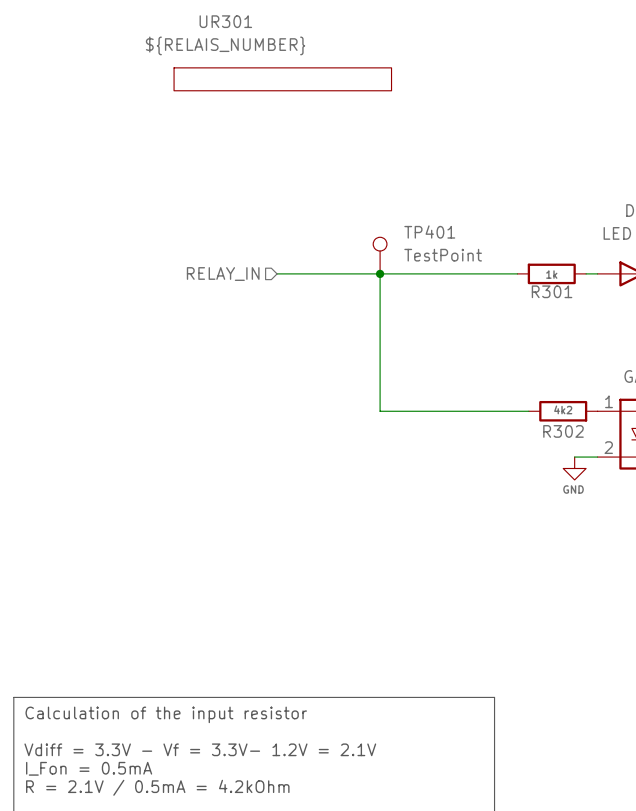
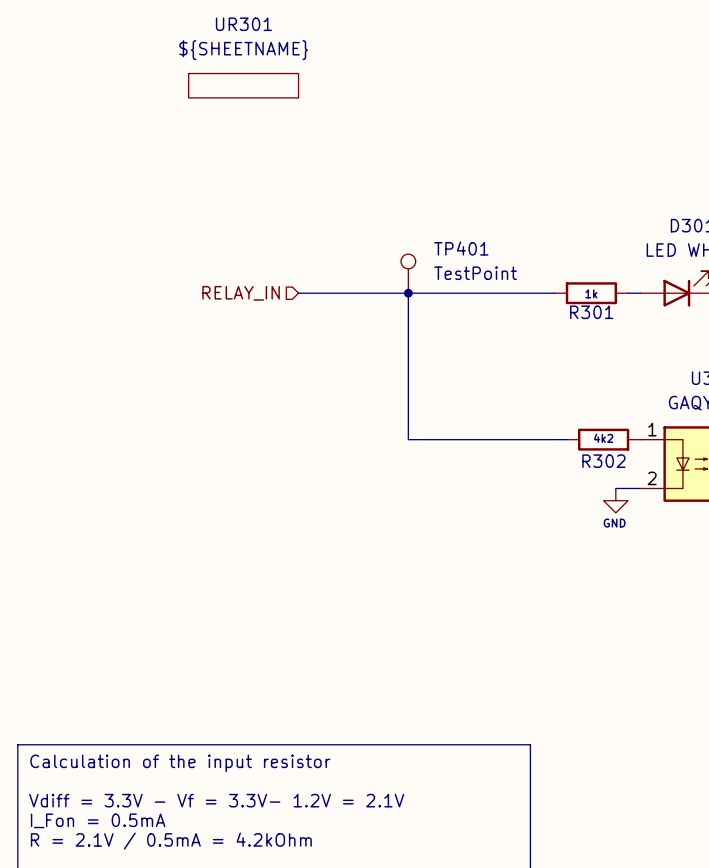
UR301 value: ${RELAIS_NUMBER} (225, 45) -> ${SHEETNAME} (243, 50)
UR301 symbol: [174, 67, 392, 91] -> [188, 73, 299, 98]

